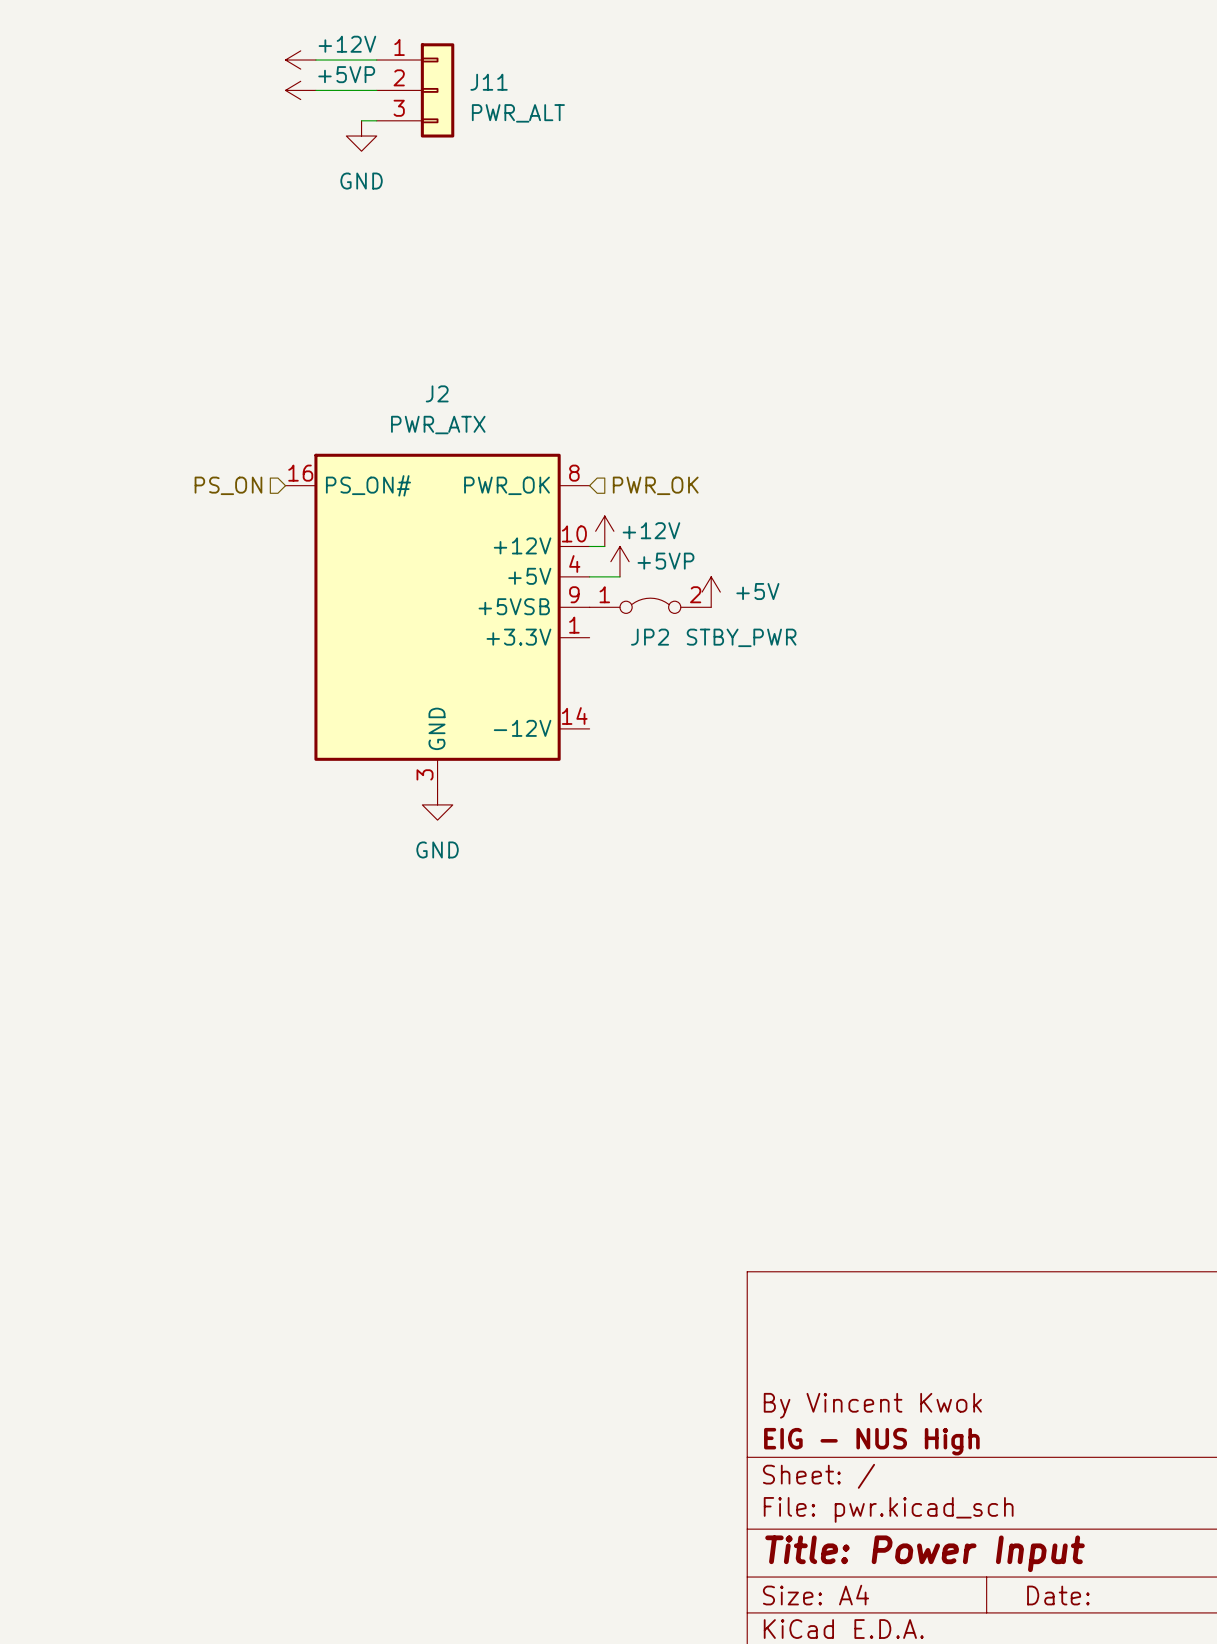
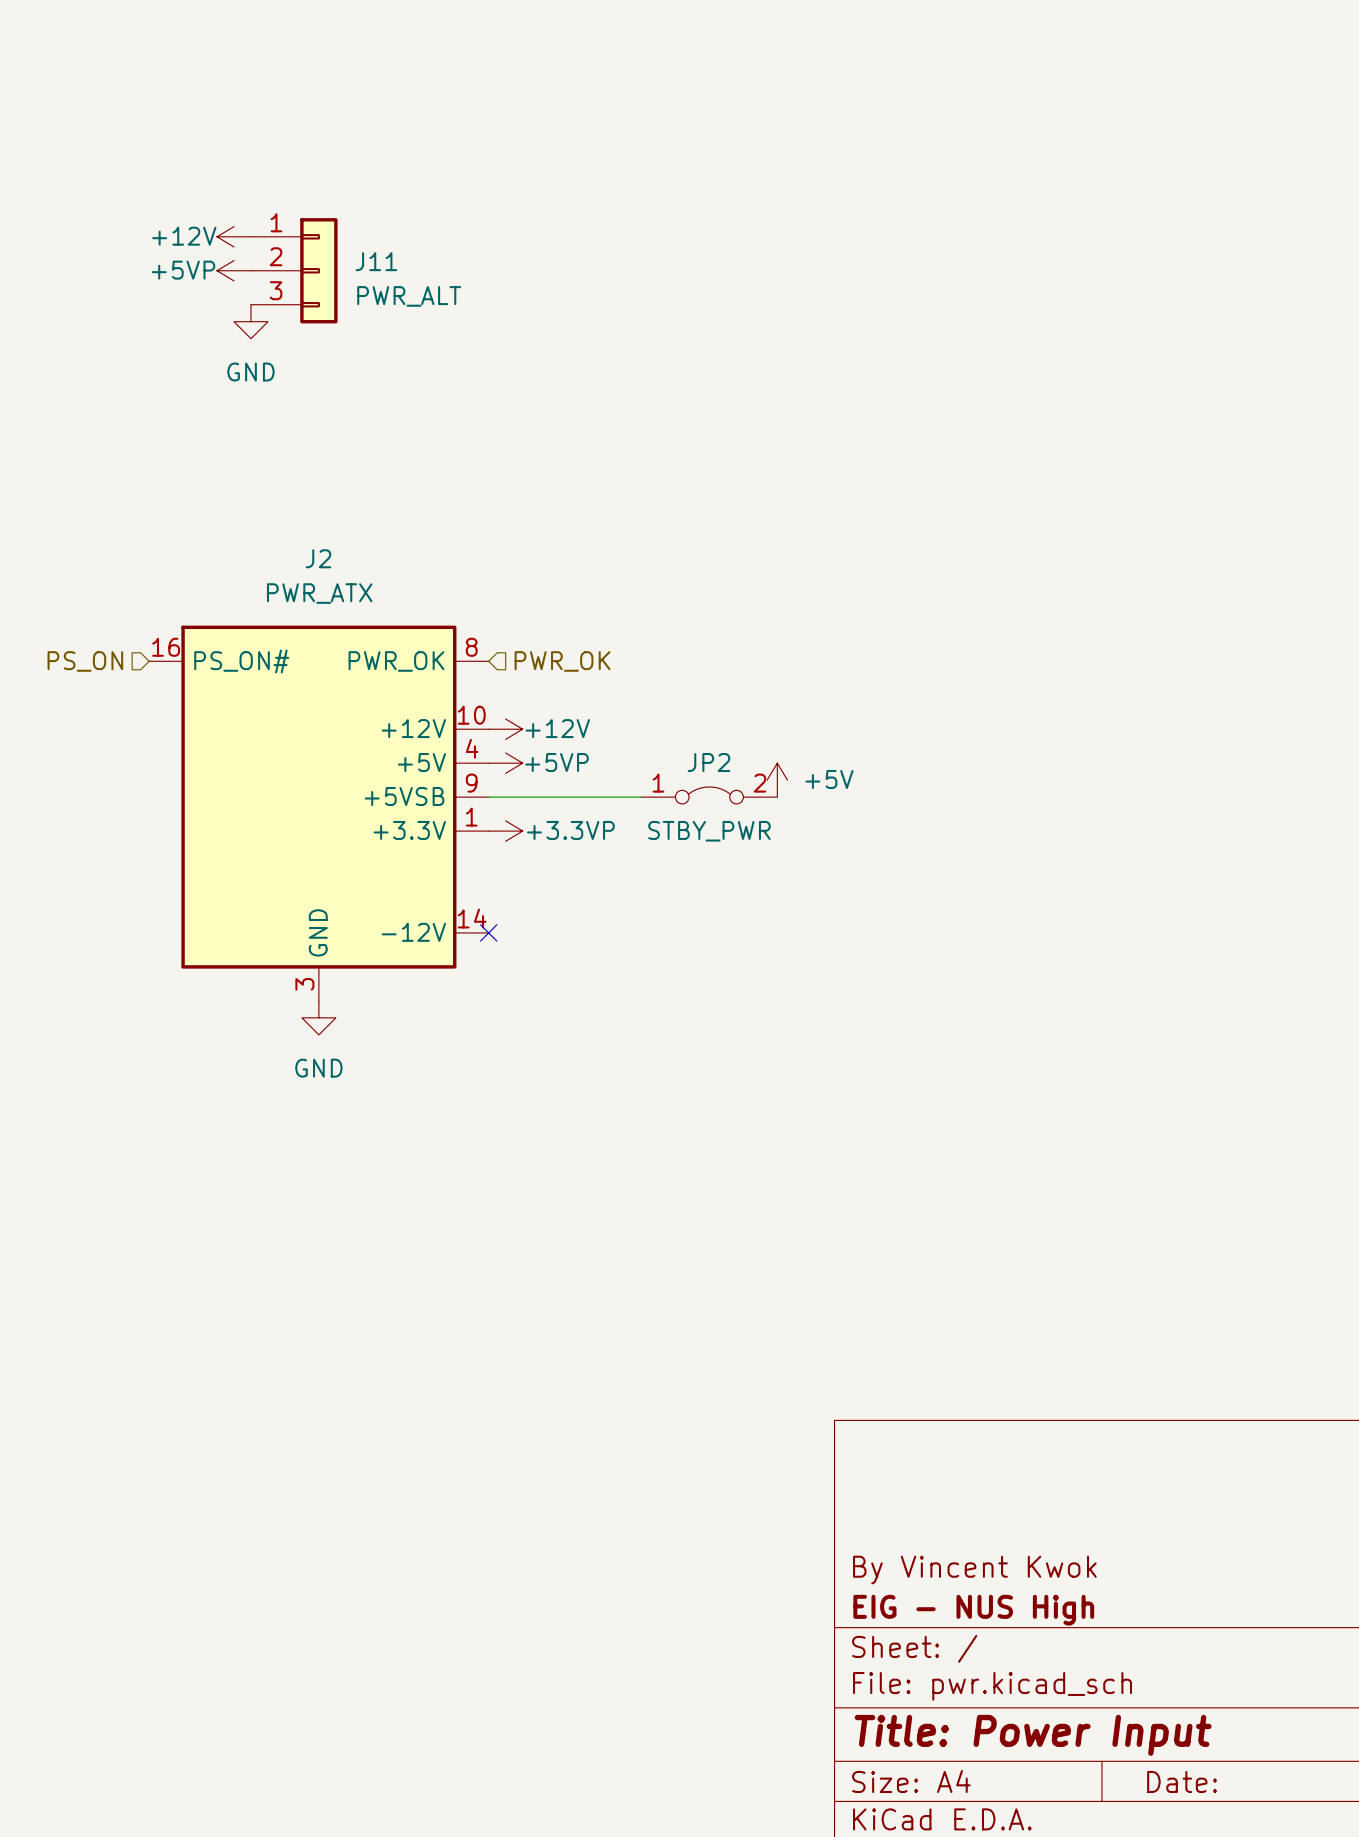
power symbol text position: +12V (347, 44) -> +12V (184, 236)
power symbol position: +12V (300, 60) -> +12V (234, 236)
wire: (315, 60) (376, 60) -> none
power symbol text position: +5VP (346, 74) -> +5VP (183, 270)
power symbol position: +5VP (300, 90) -> +5VP (234, 270)
wire: (315, 90) (376, 90) -> none
J11 position: (415, 90) -> (294, 270)
wire: (361, 120) (376, 120) -> none
power symbol position: GND (361, 136) -> GND (250, 321)
hierarchical label position: PS_ON (228, 485) -> PS_ON (85, 661)
hierarchical label position: PWR_OK (655, 485) -> PWR_OK (562, 661)
power symbol rotation: 0° (604, 531) -> 90° clockwise (505, 729)
power symbol position: +12V (604, 531) -> +12V (505, 729)
wire: (589, 546) (604, 546) -> none
power symbol rotation: 0° (619, 561) -> 90° clockwise (505, 763)
power symbol position: +5VP (619, 561) -> +5VP (505, 763)
wire: (589, 576) (619, 576) -> none
power symbol position: +5V (711, 592) -> +5V (777, 780)
JP2 position: (650, 605) -> (709, 795)
J2 position: (437, 621) -> (318, 813)
JP2 name position: JP2 (650, 637) -> JP2 (709, 762)
JP2 value position: STBY_PWR (741, 637) -> STBY_PWR (709, 831)
power symbol: none -> +3.3VP (505, 831)
power symbol position: GND (437, 804) -> GND (318, 1017)
no-connect mark: none -> (488, 932)

